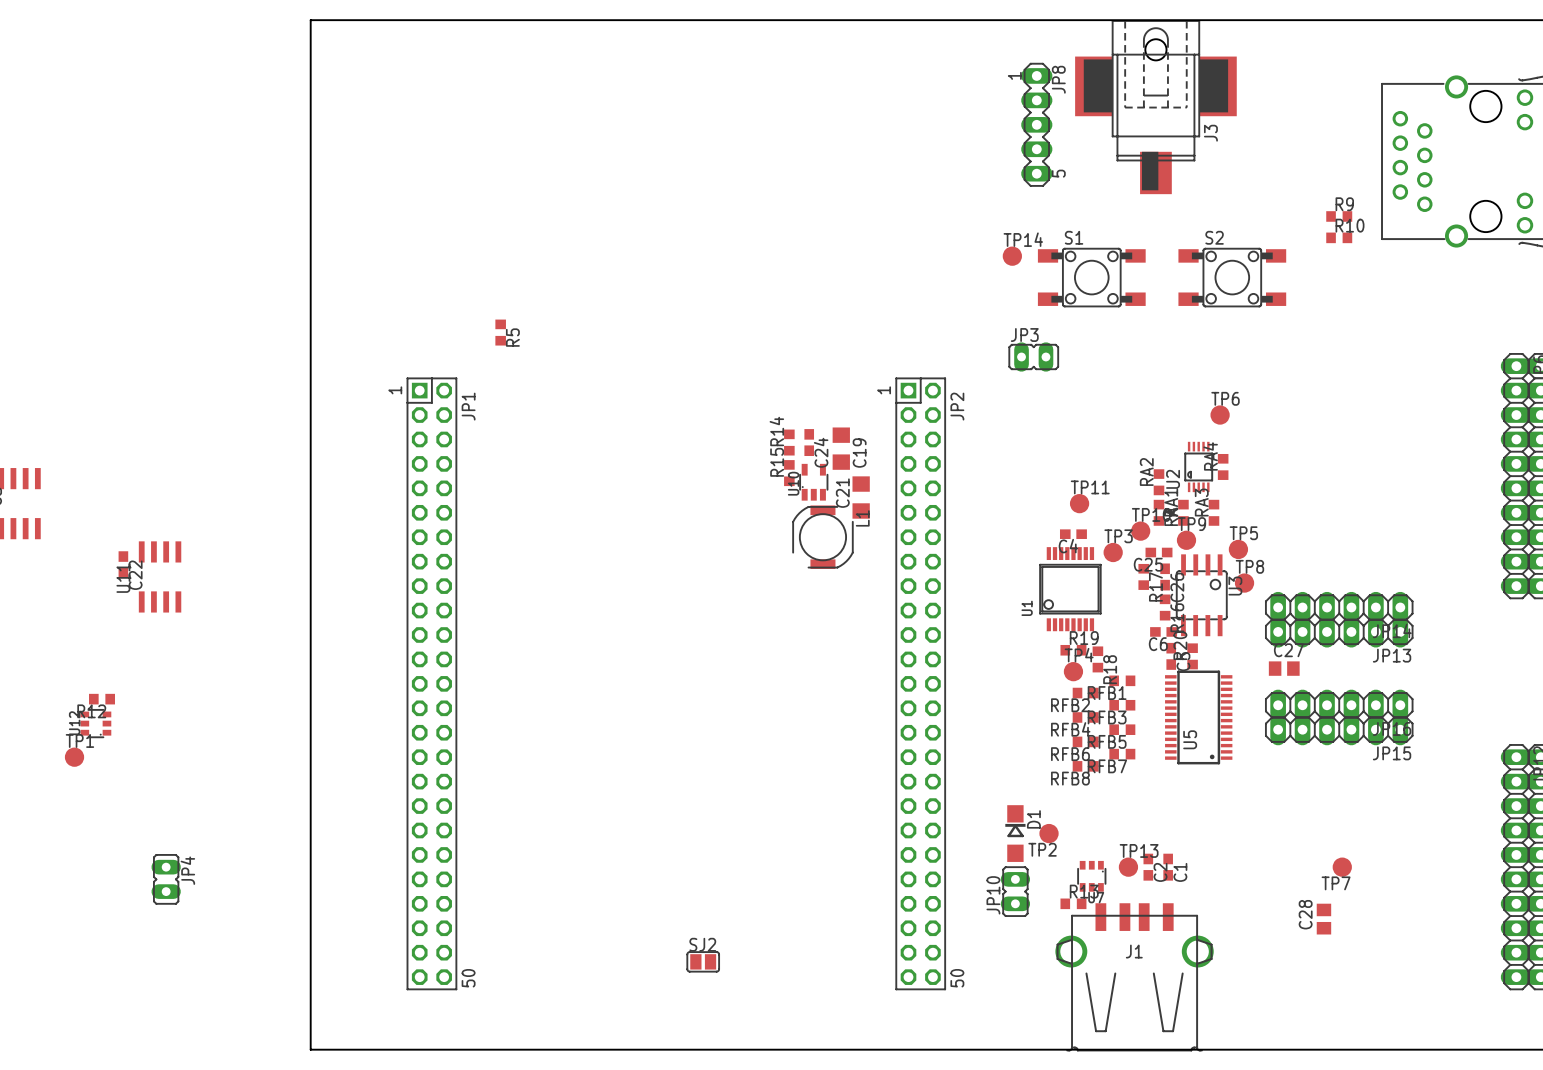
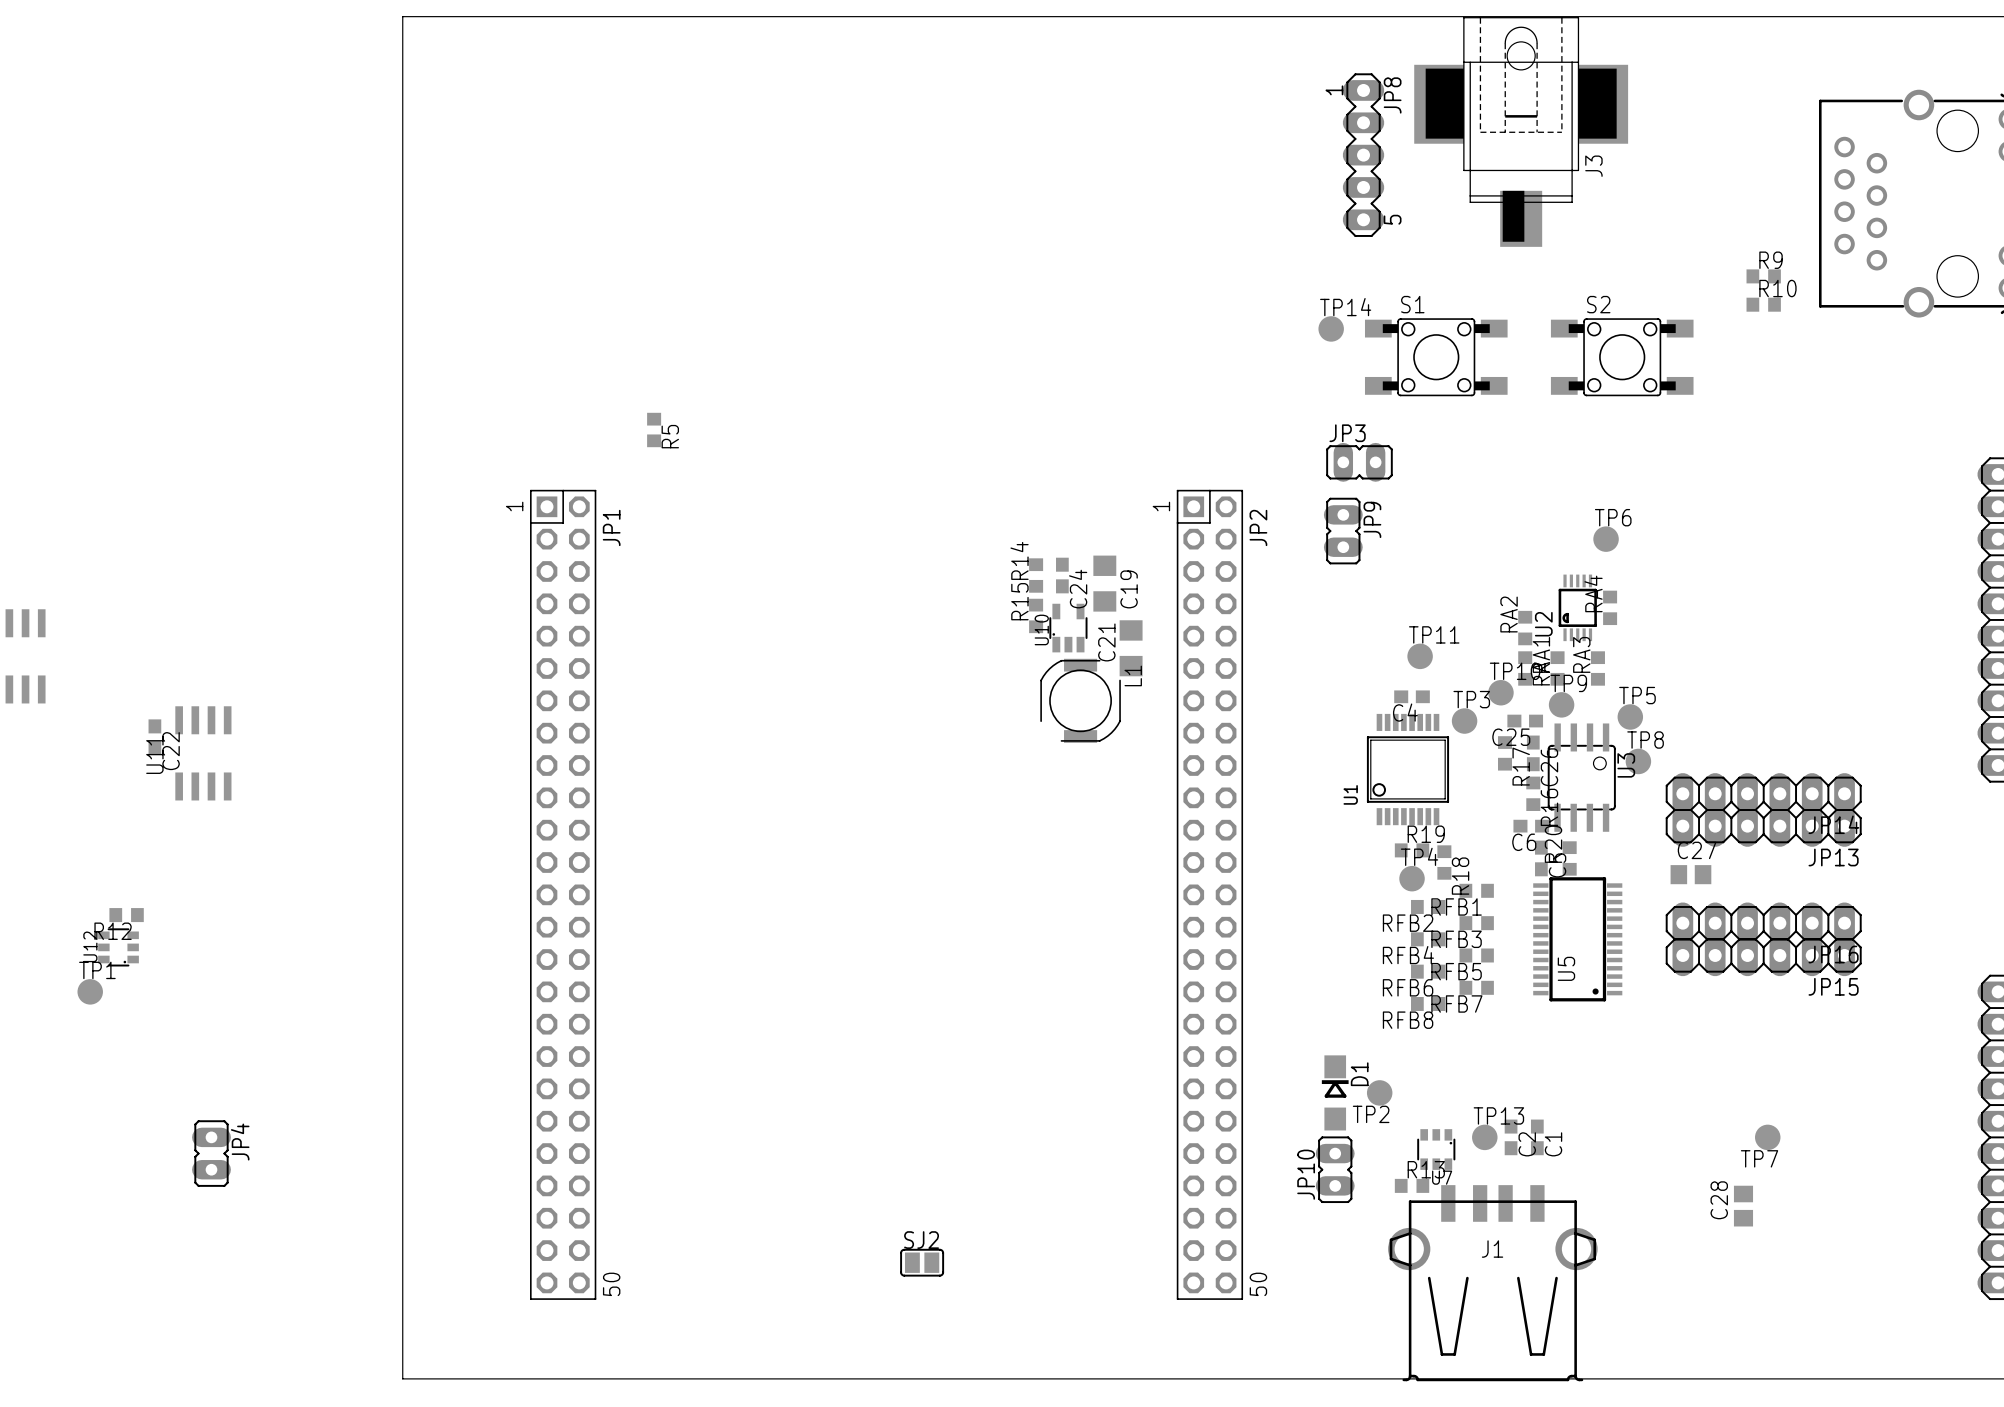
JP9: none -> (1343, 531)

